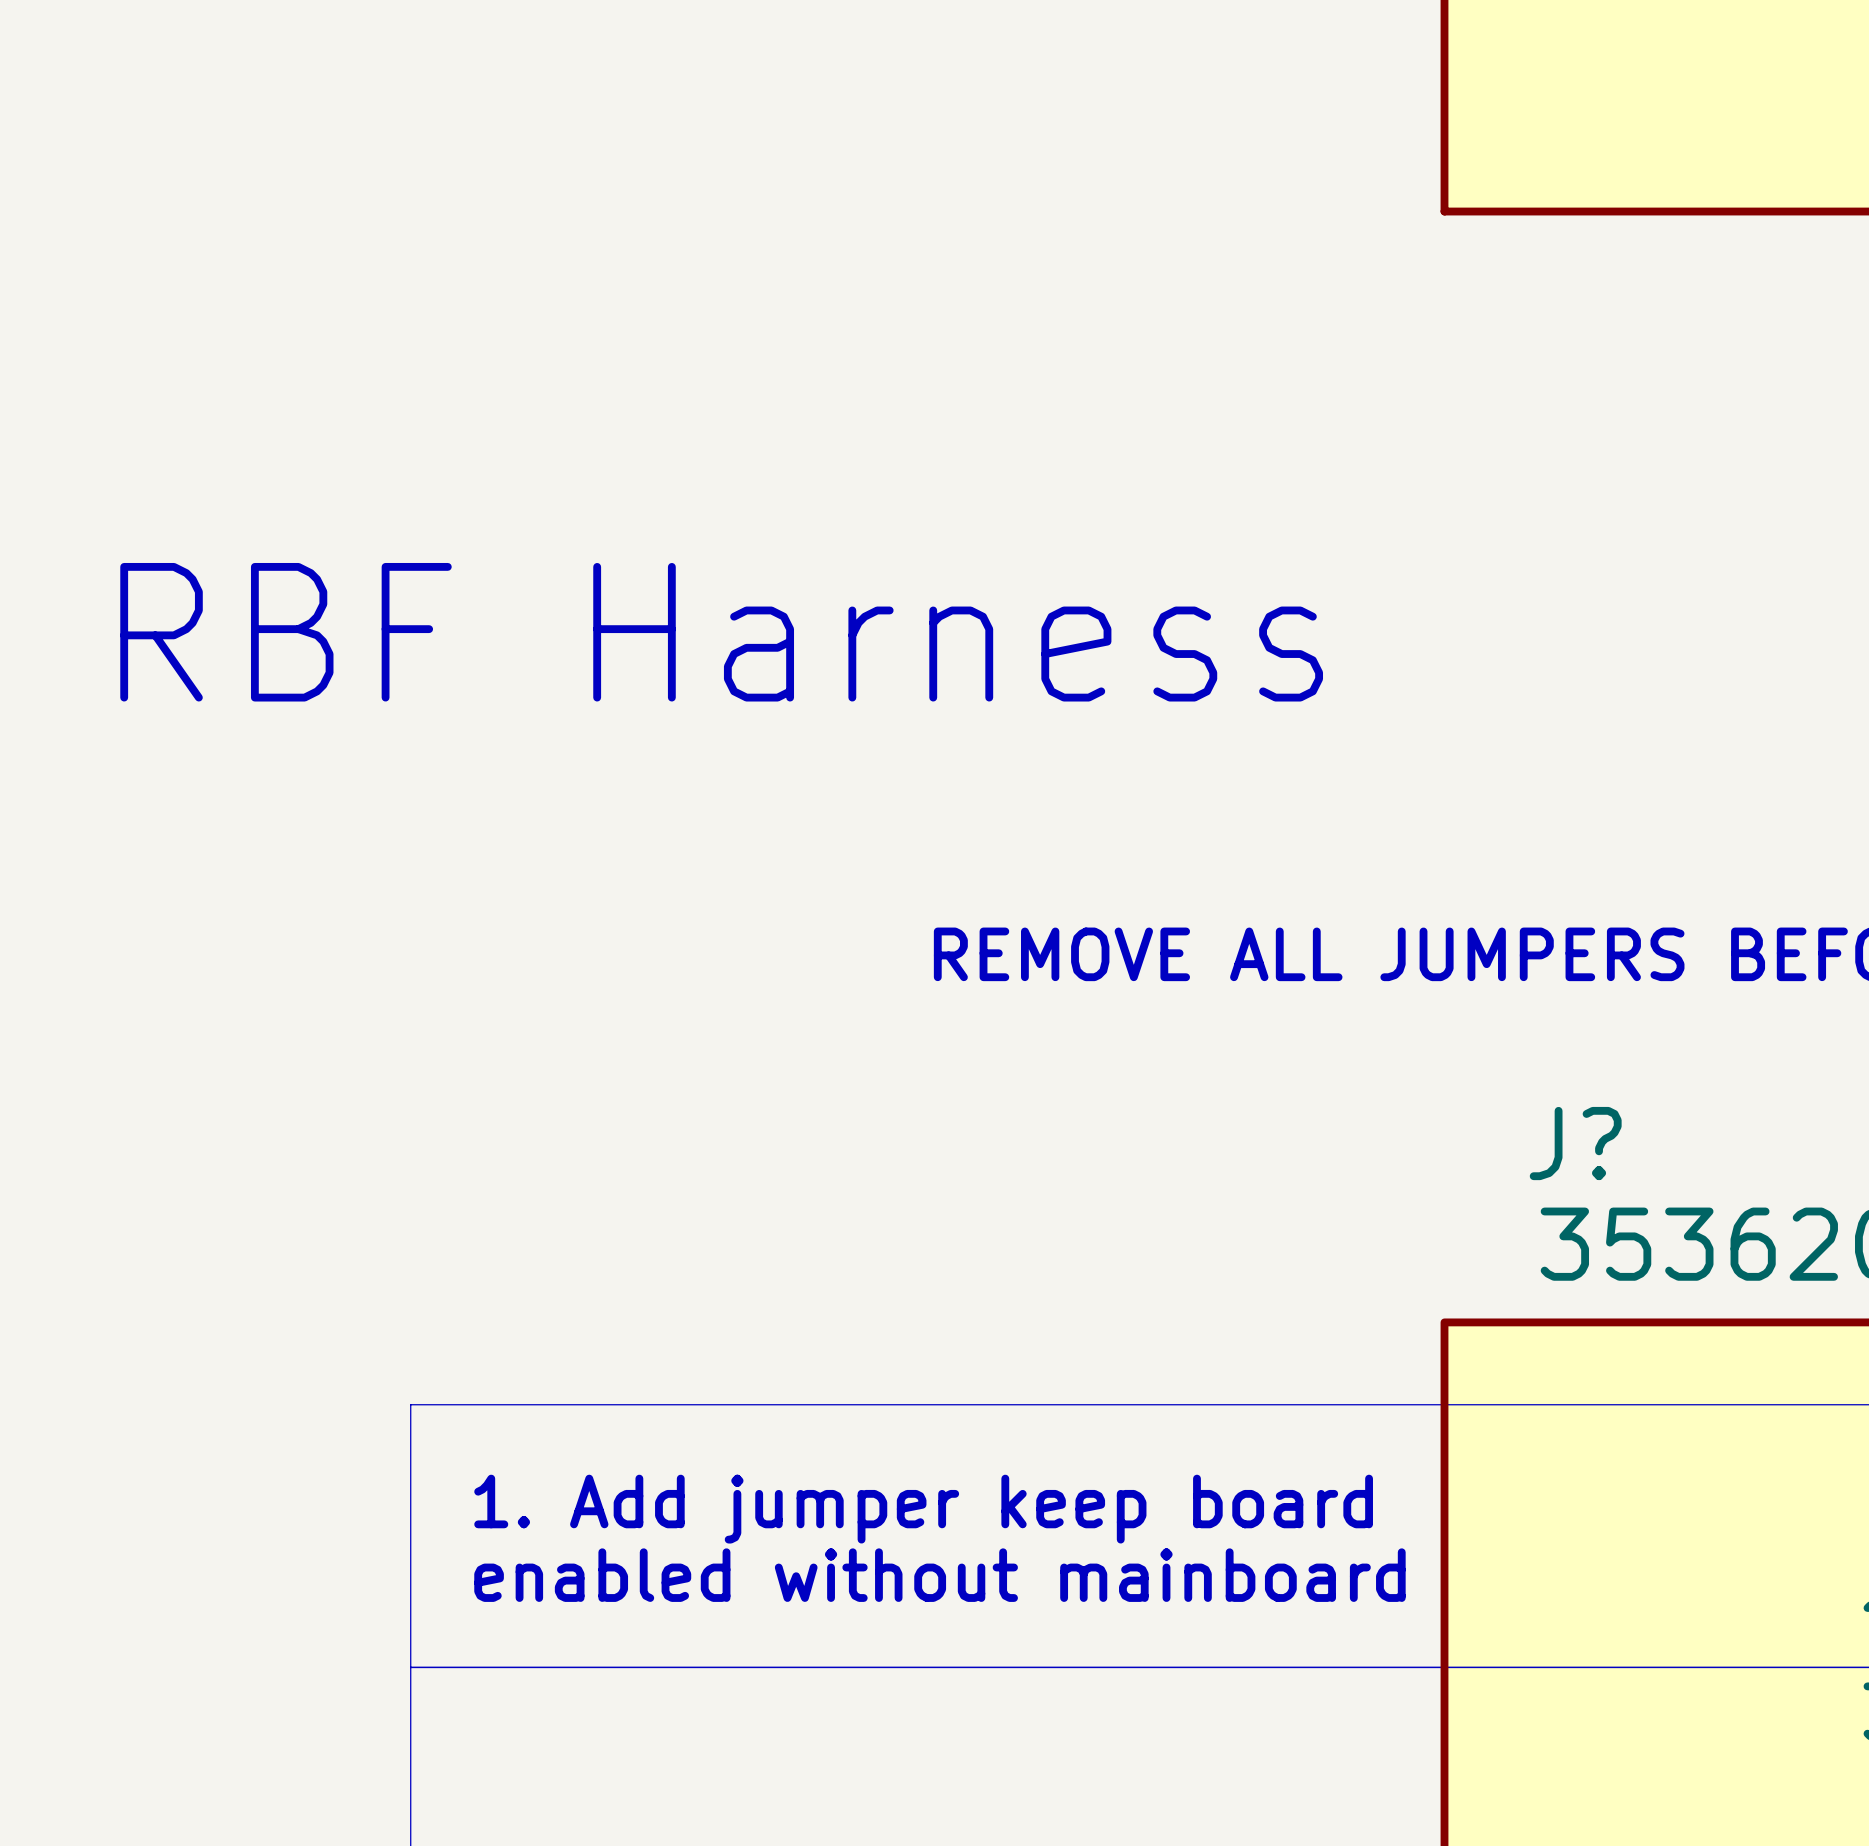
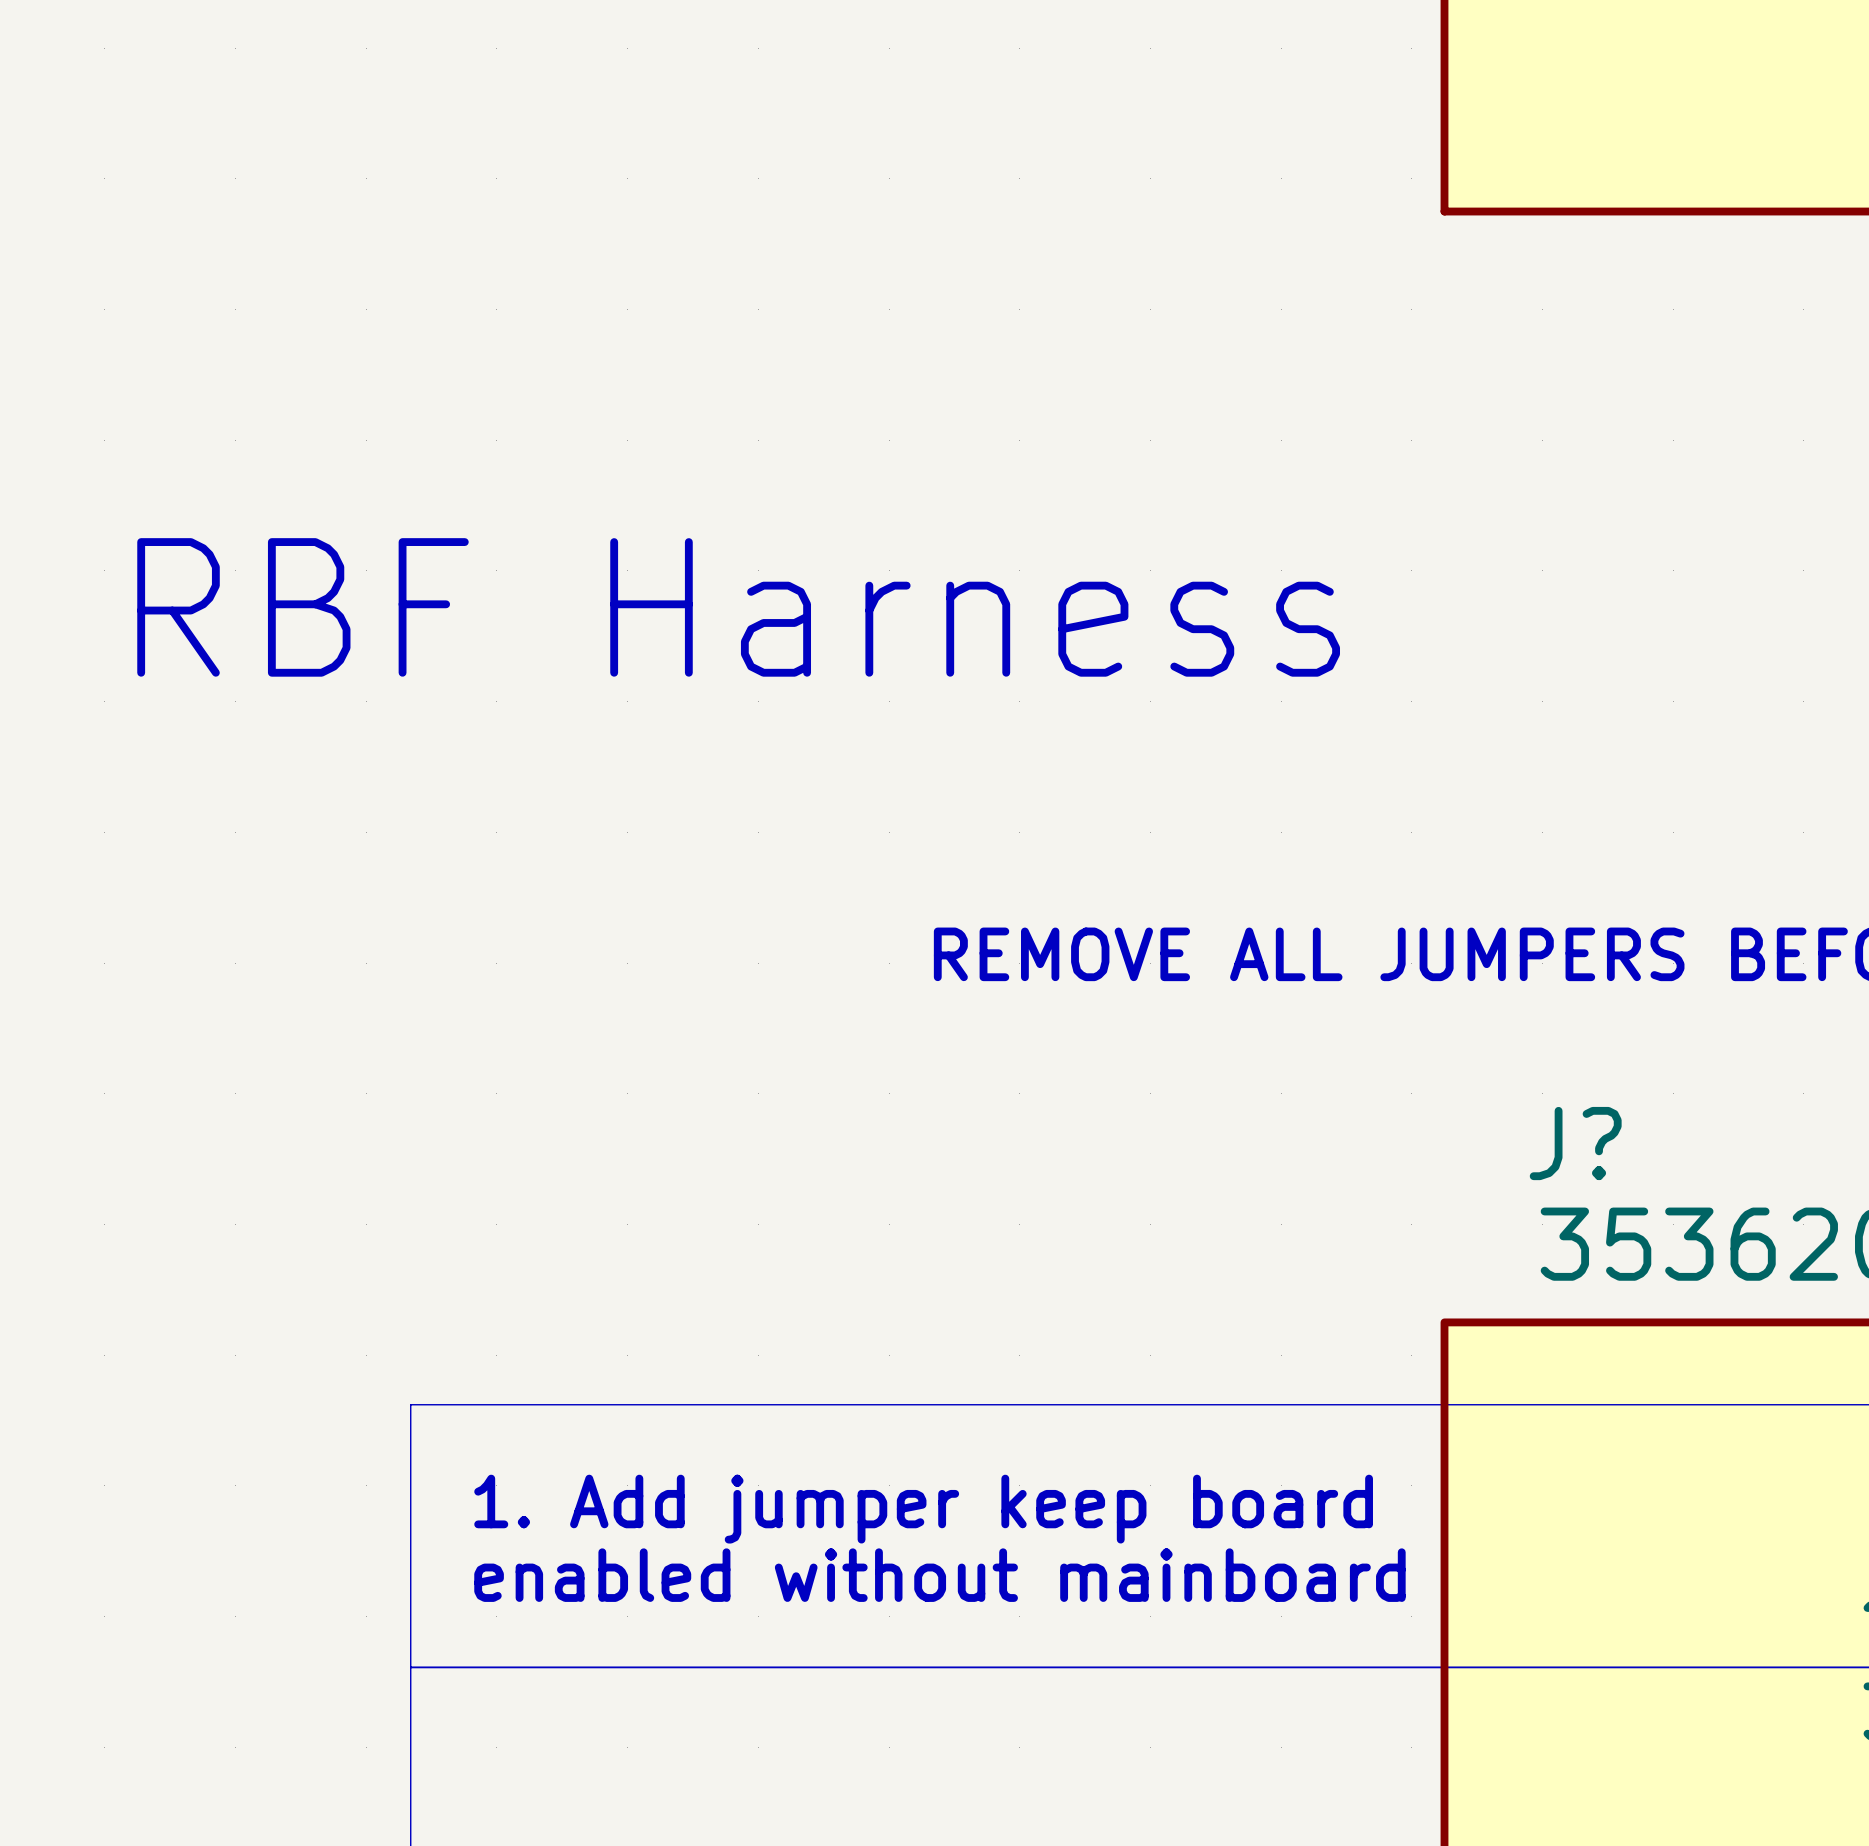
text position: RBF Harness (721, 632) -> RBF Harness (738, 607)

